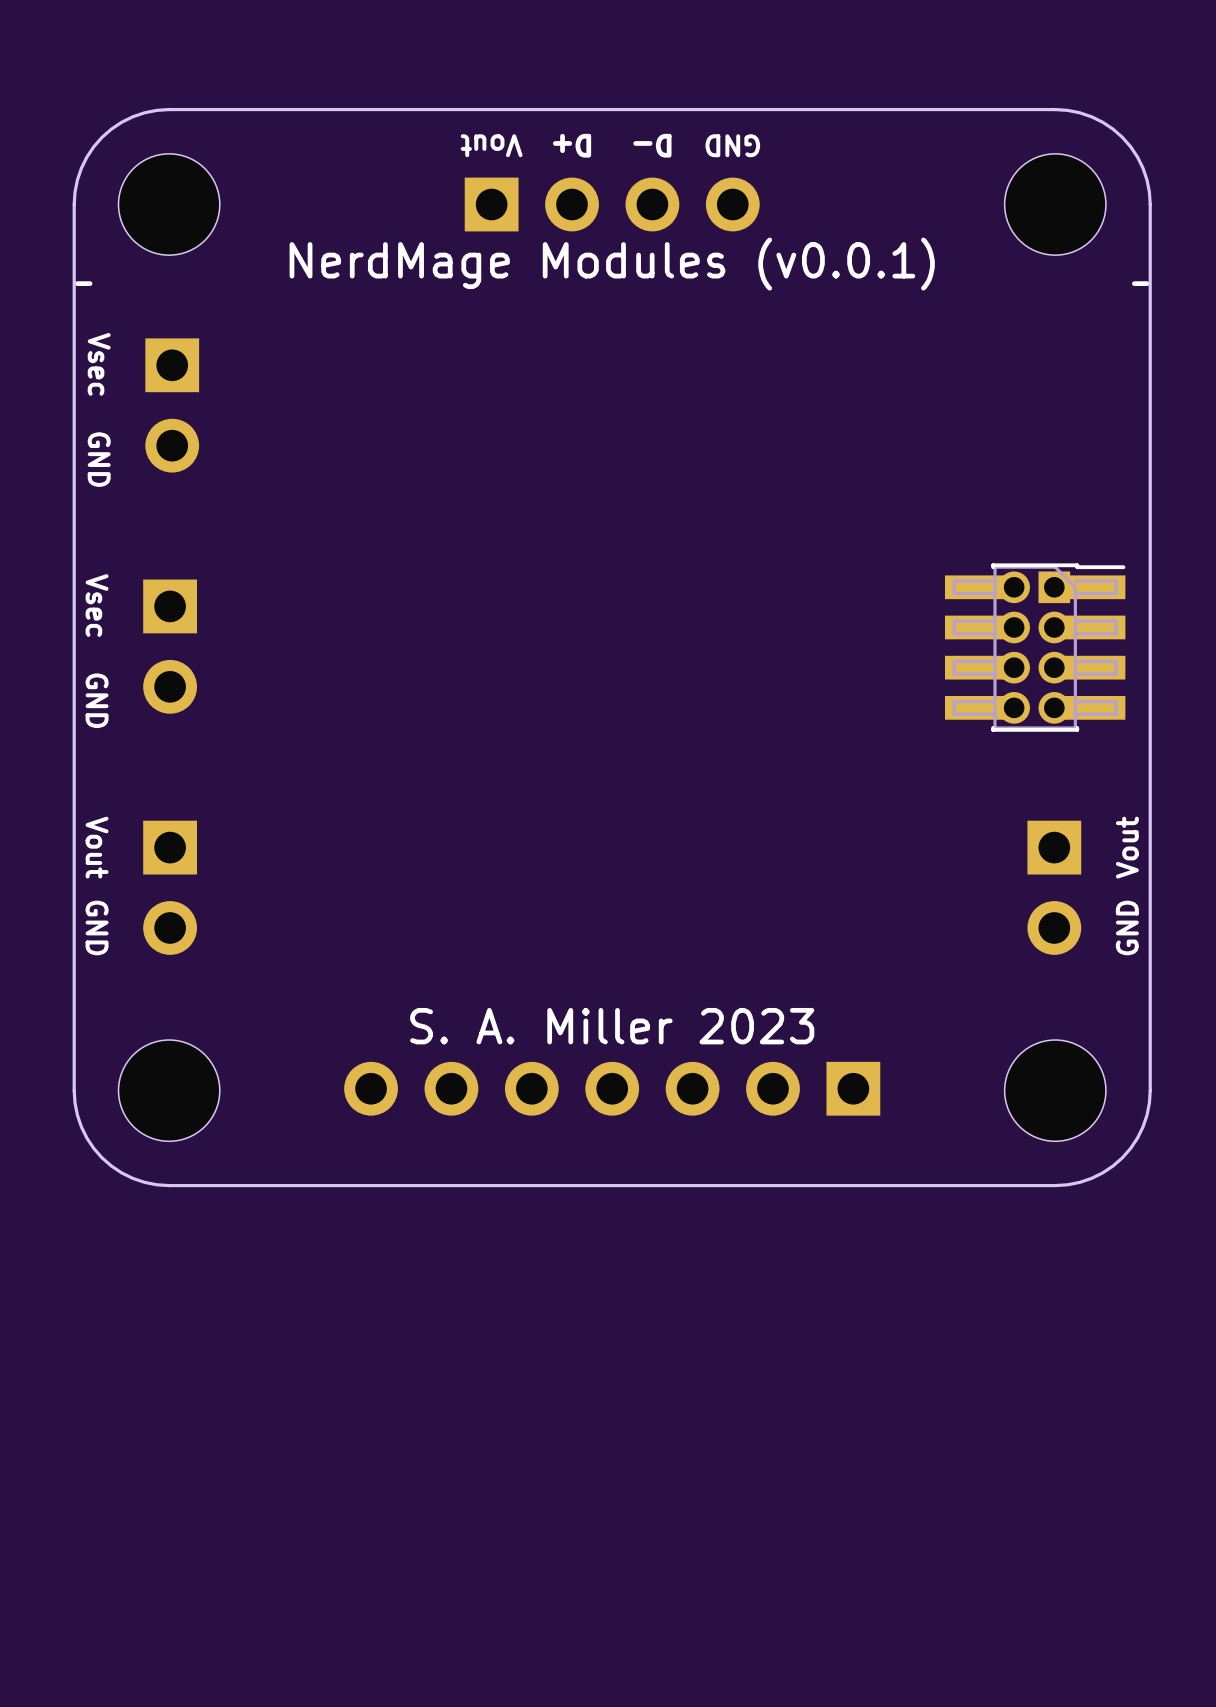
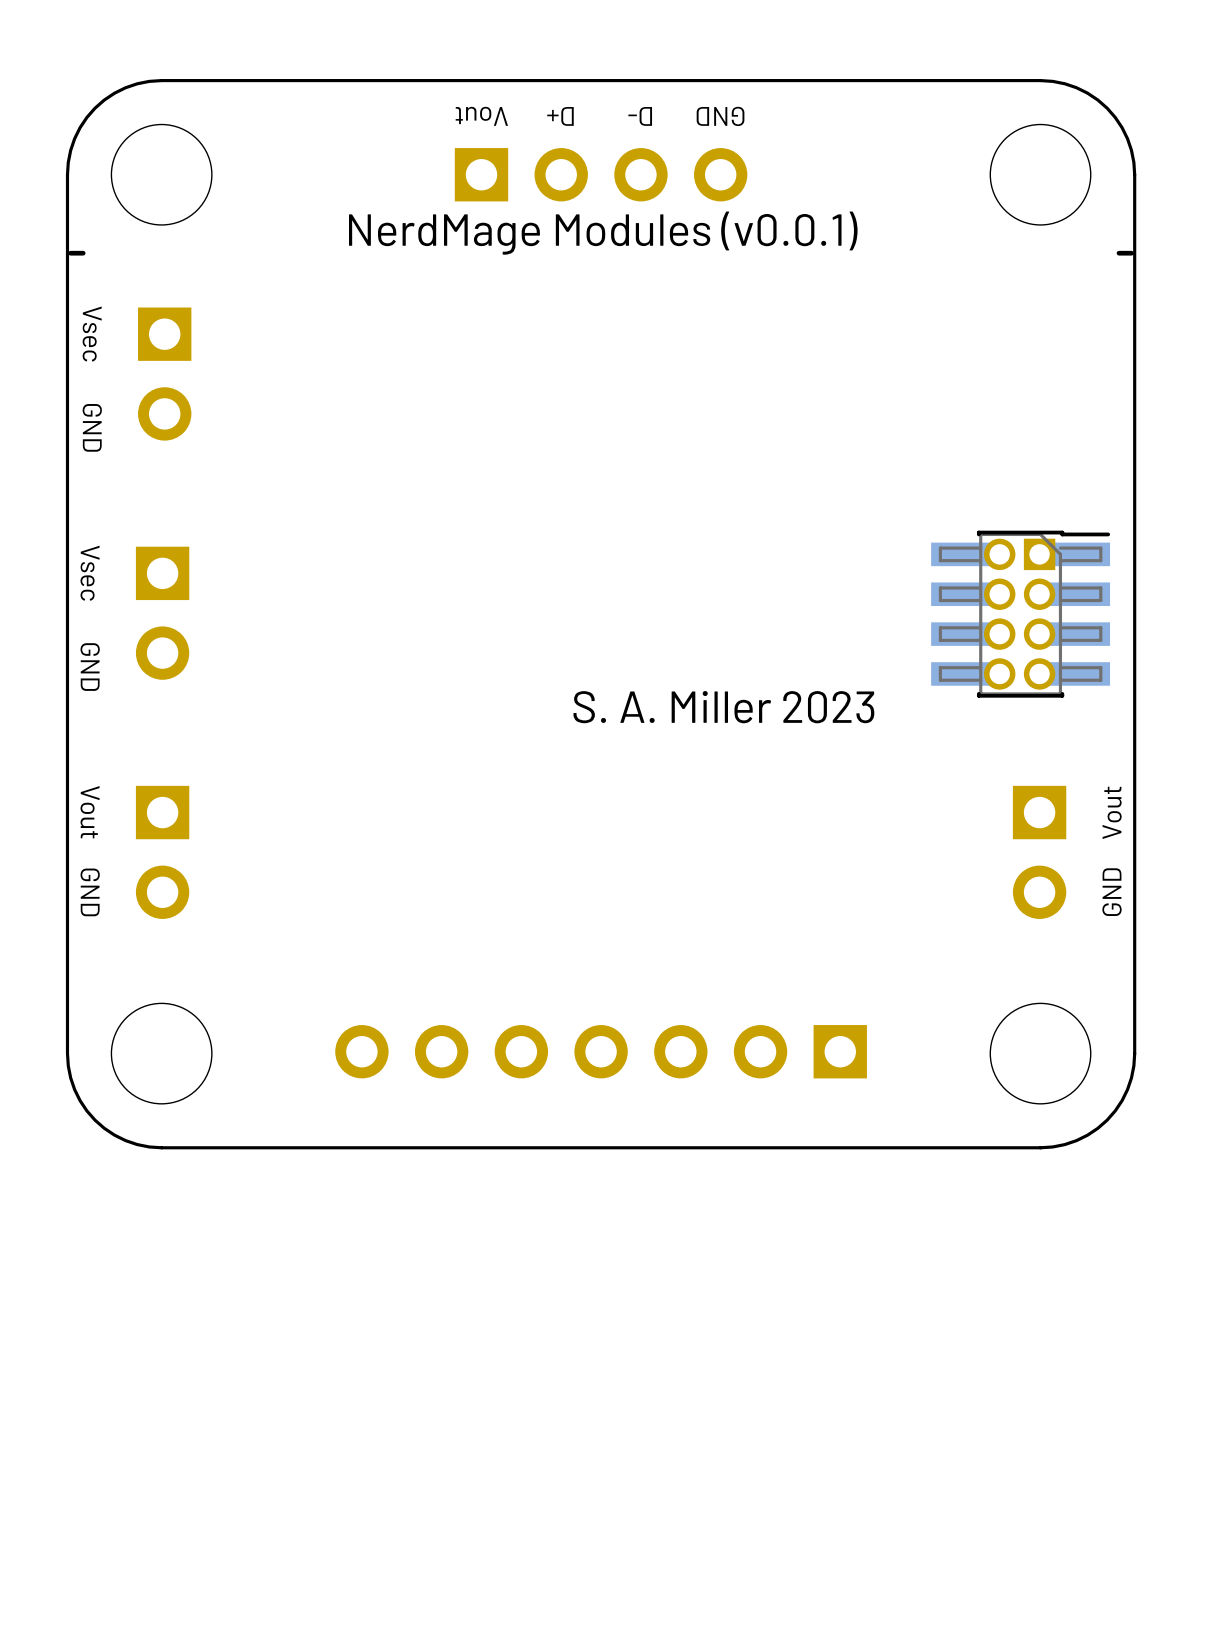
text position: S. A. Miller 2023 (612, 1026) -> S. A. Miller 2023 (723, 707)

